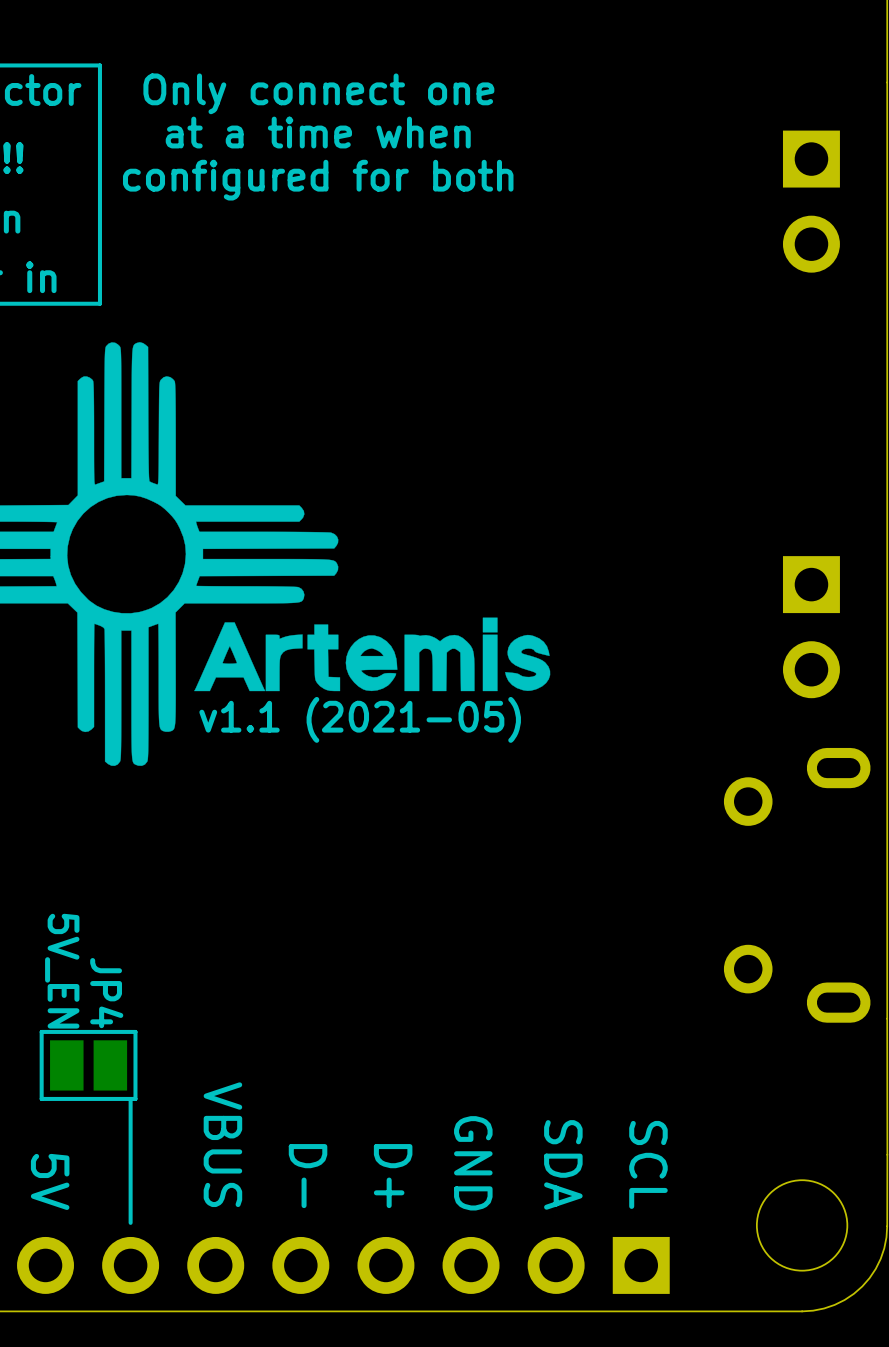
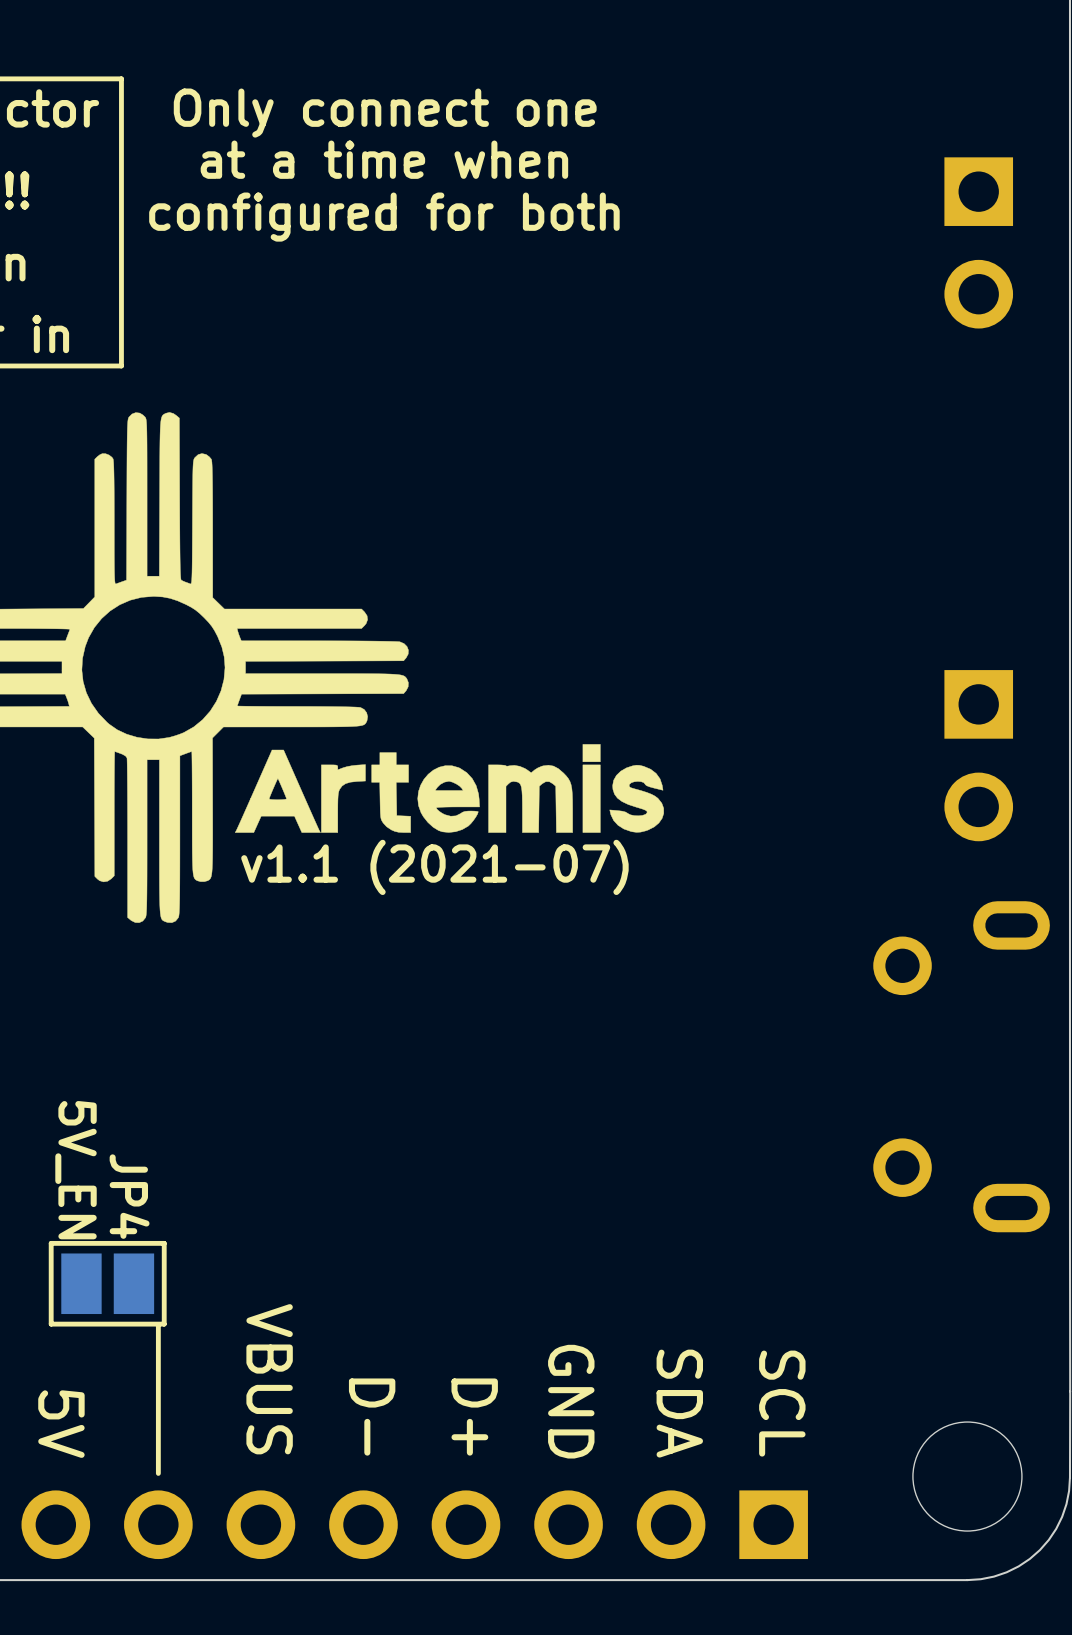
text: v1.1 (2021-05) (360, 719) -> v1.1 (2021-07) (434, 867)

